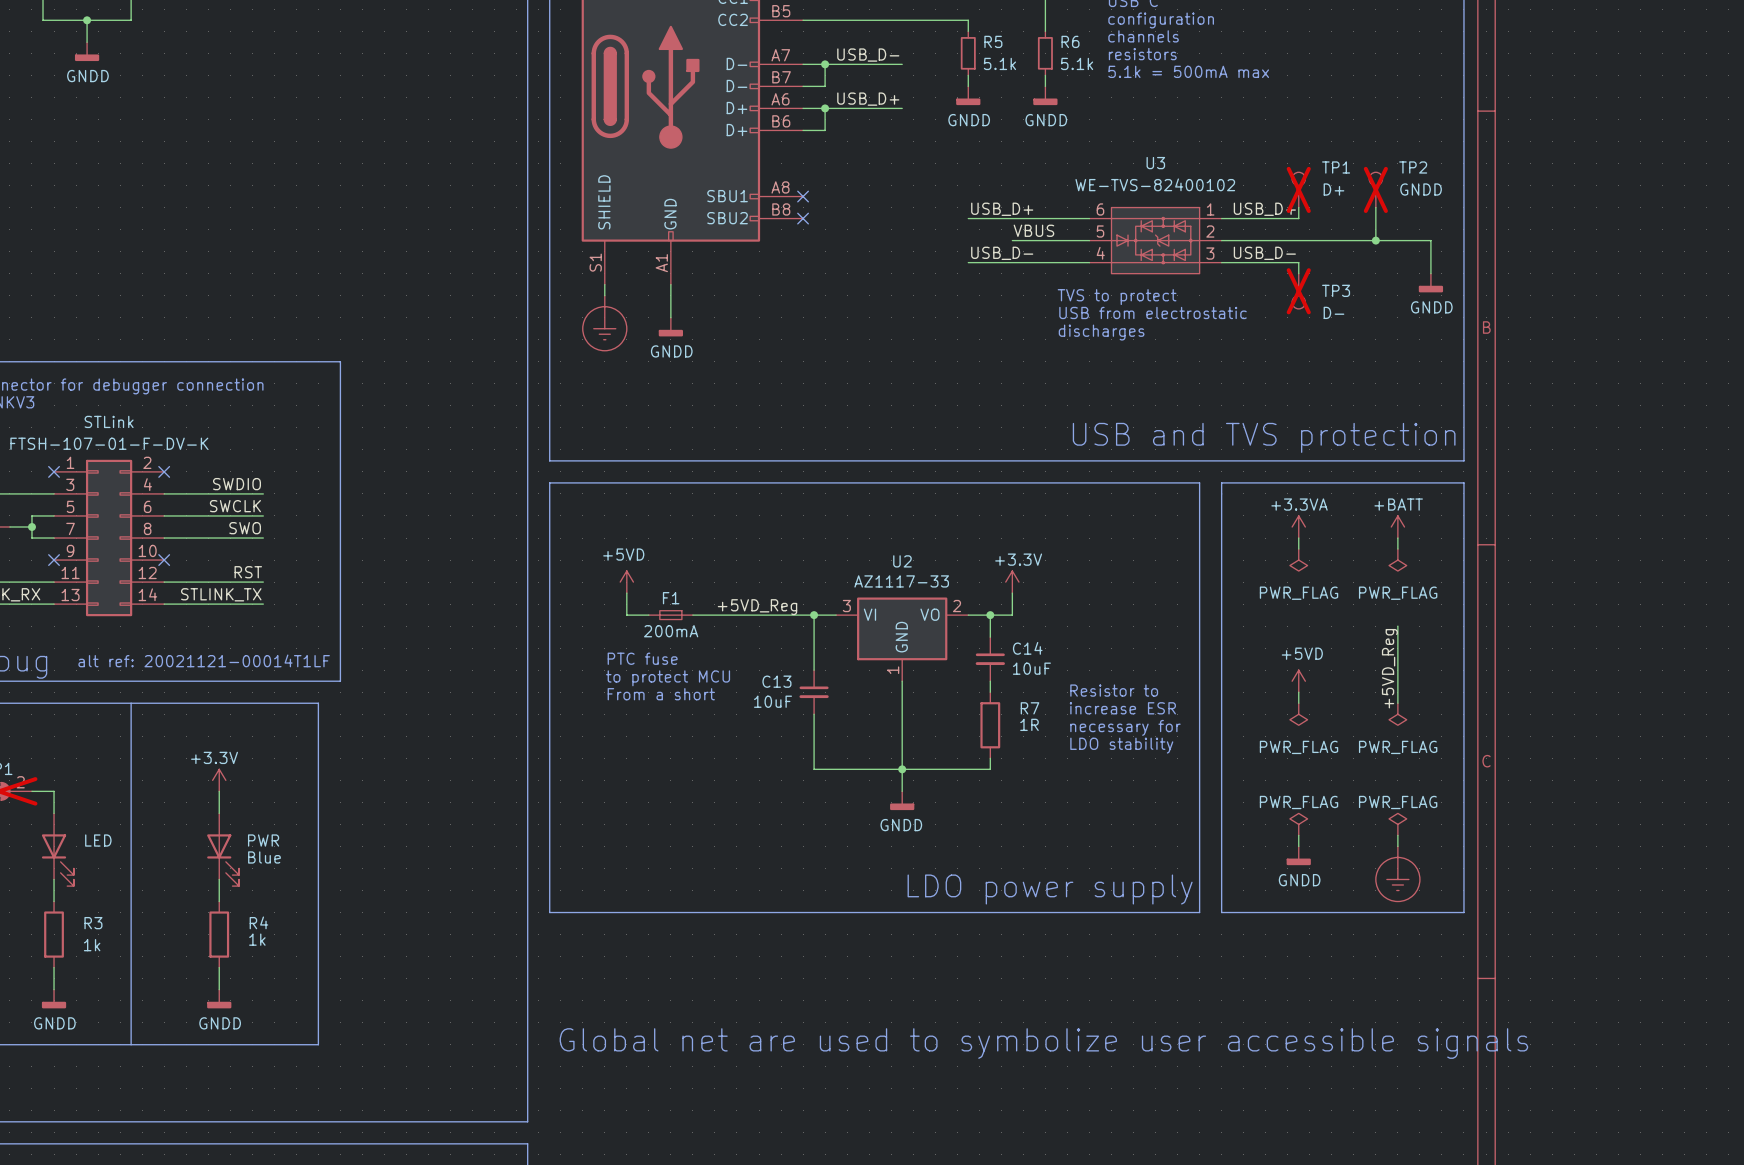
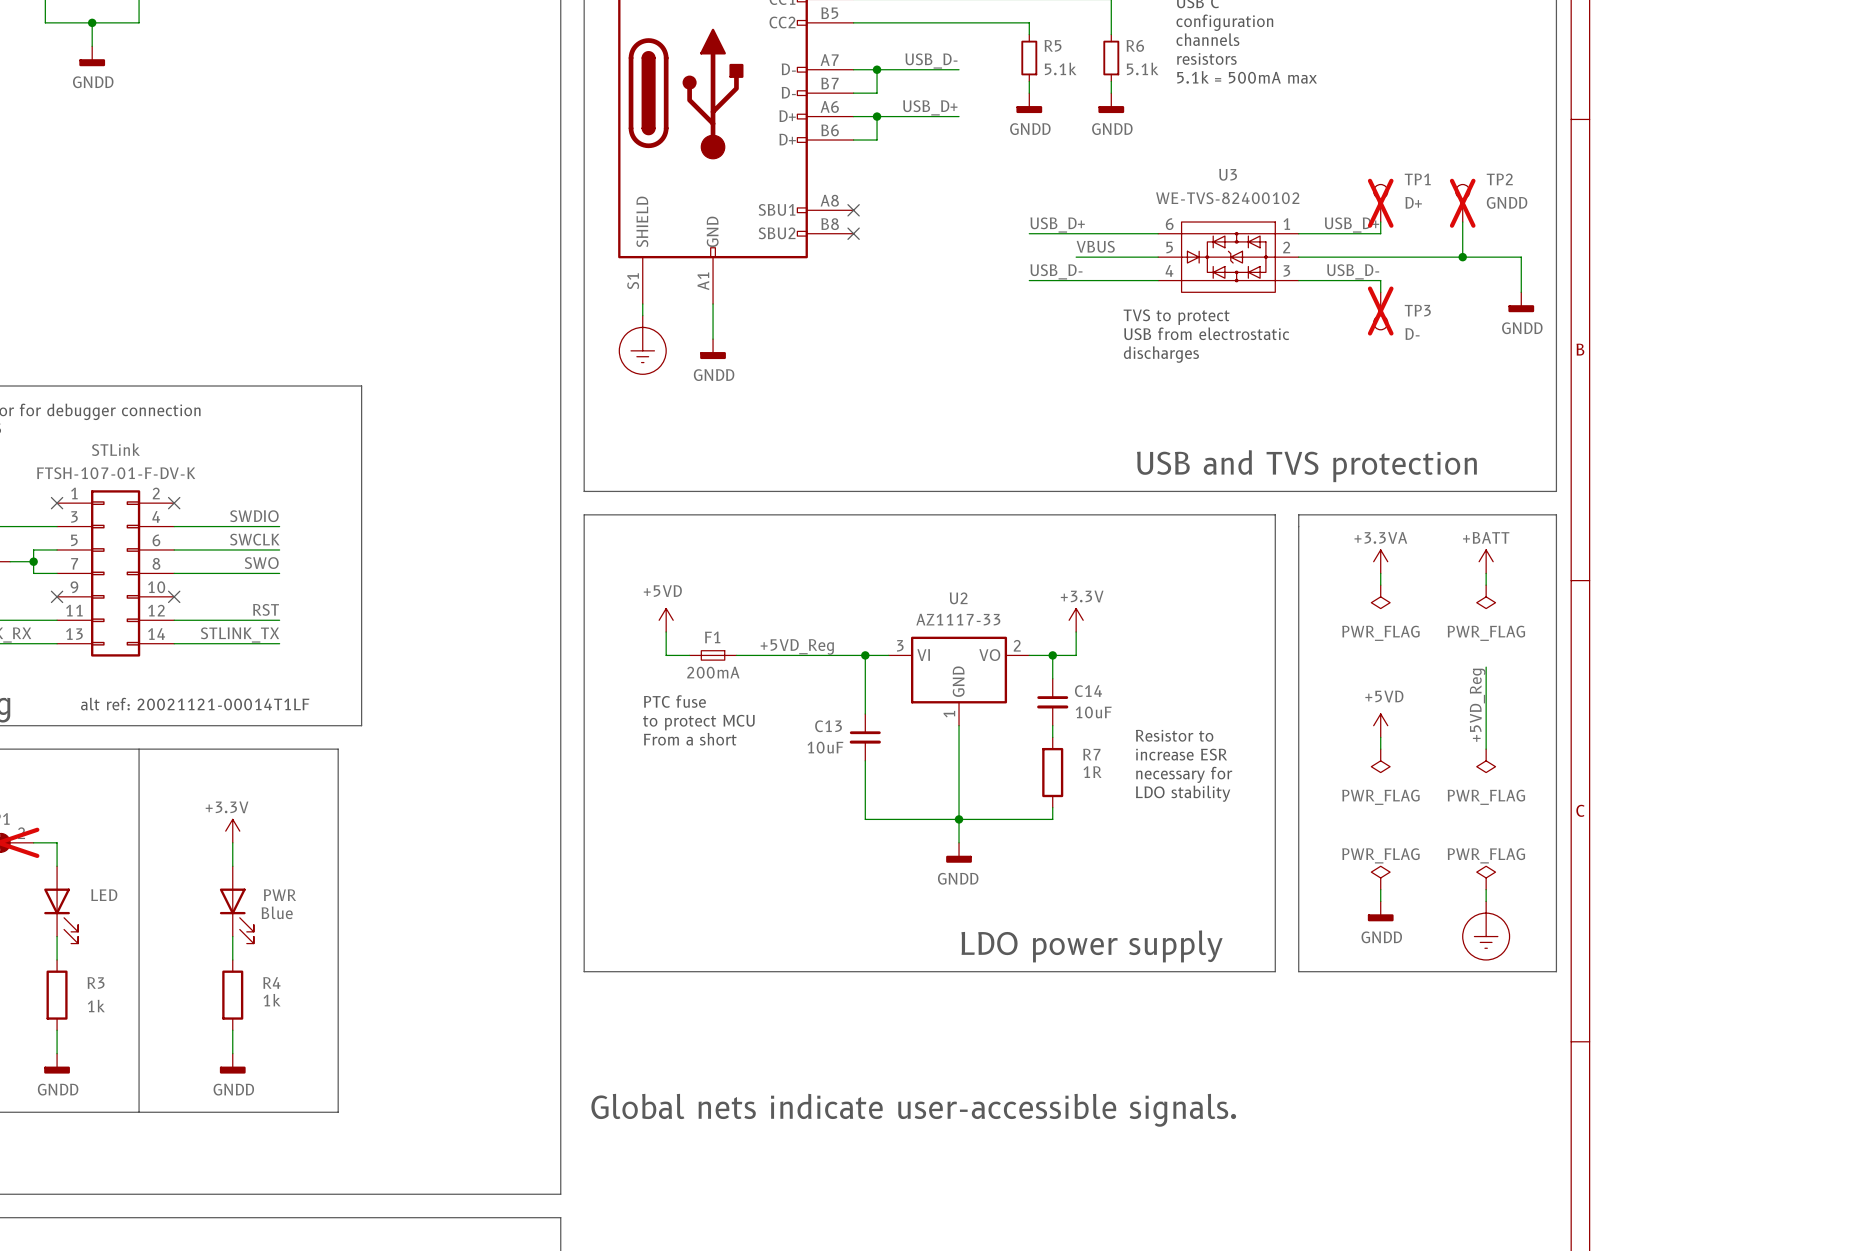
text: Global net are used to symbolize user accessible signals (1043, 1043) -> Global nets indicate user-accessible signals. (913, 1110)

